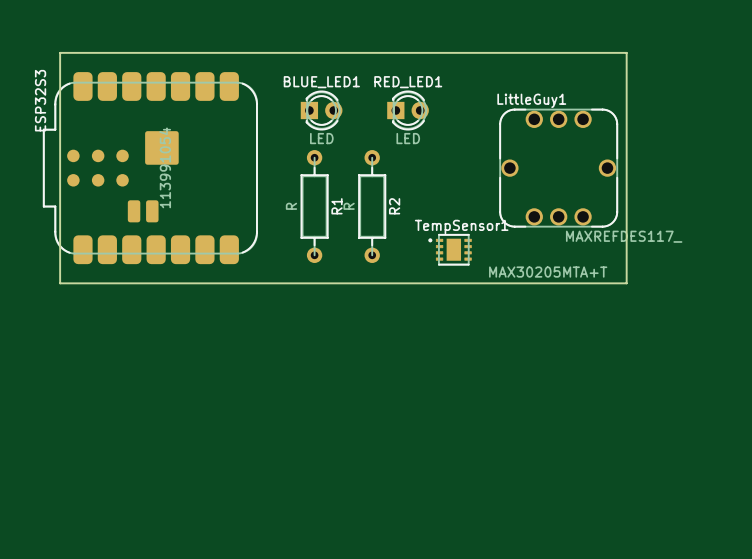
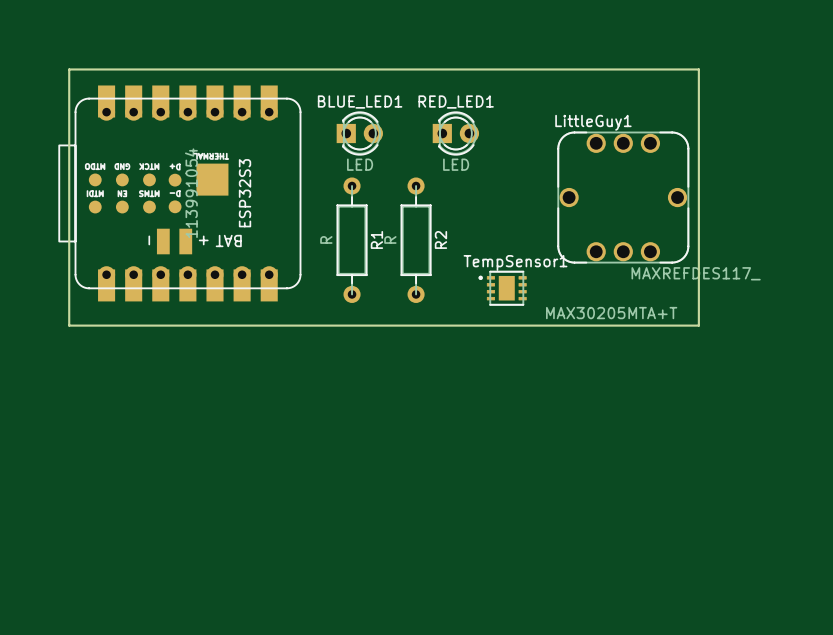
ESP32S3 footprint: [43, 72, 258, 265] -> [58, 85, 302, 302]
ESP32S3 name position: ESP32S3 (40, 100) -> ESP32S3 (245, 193)

